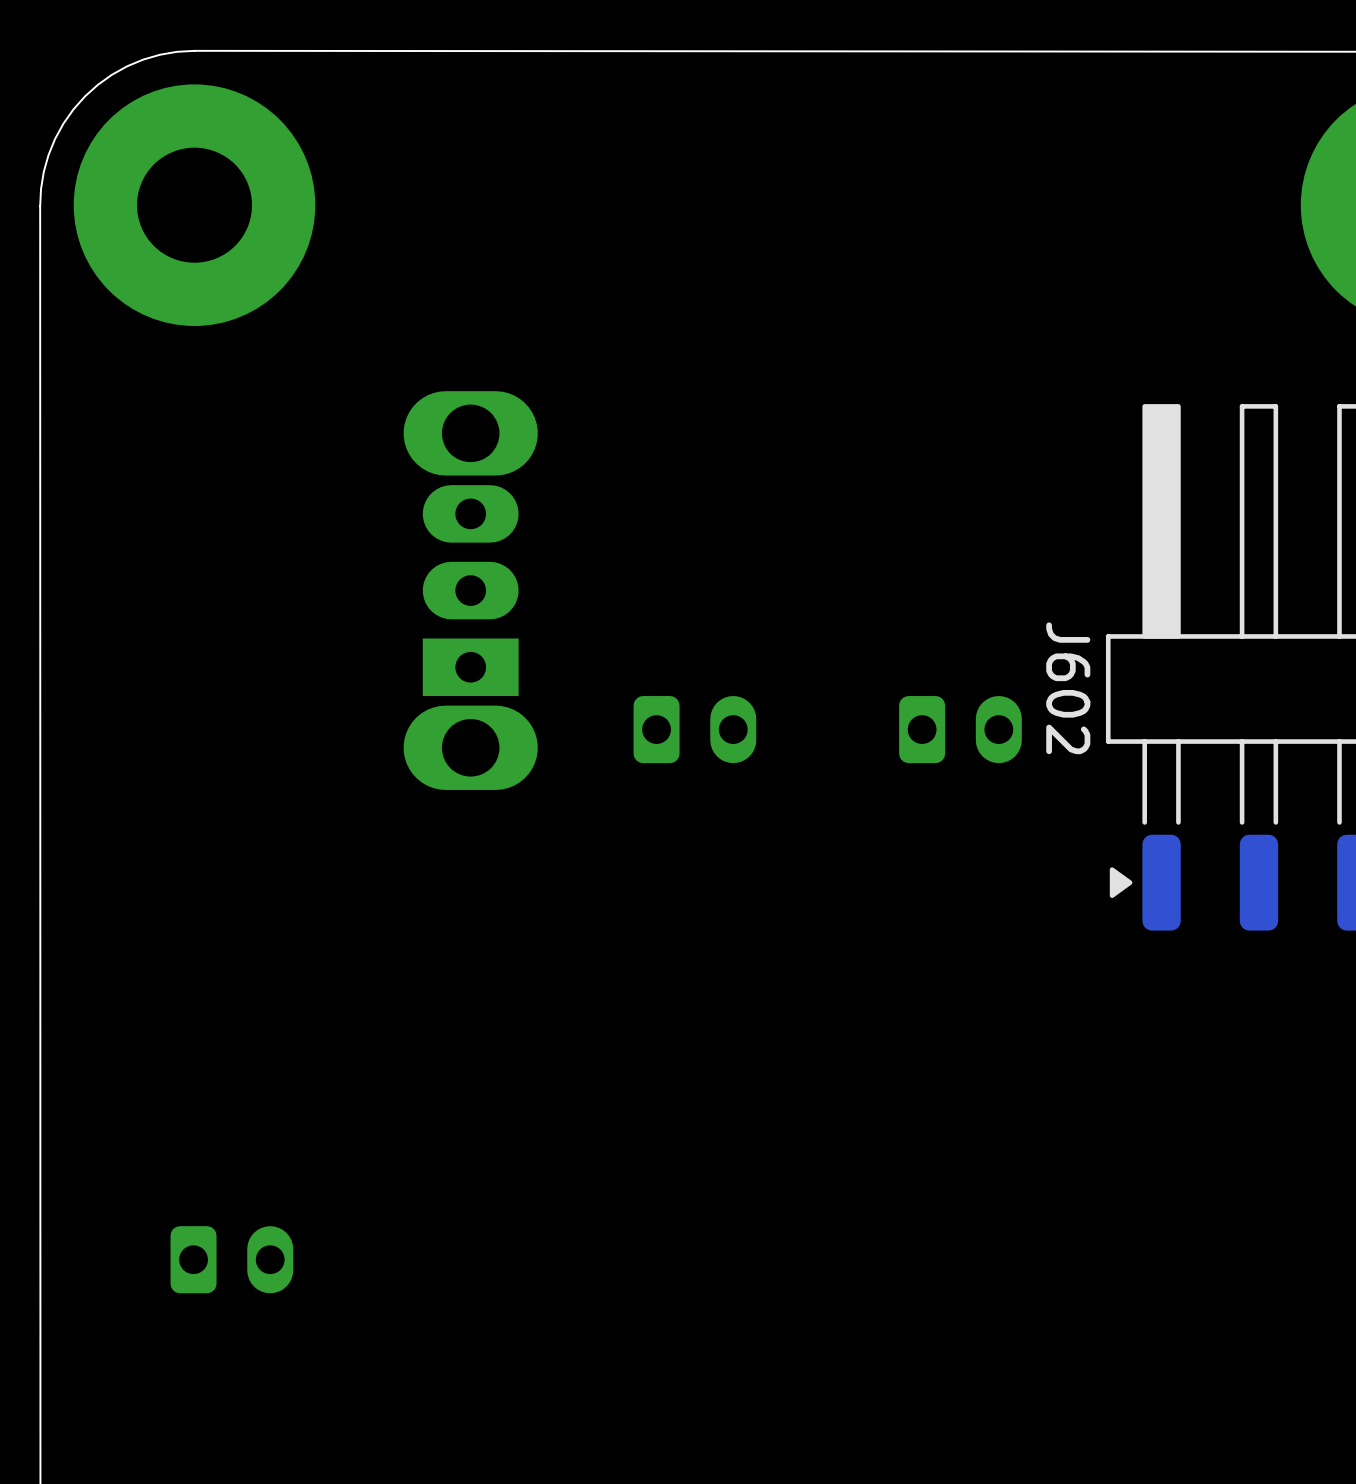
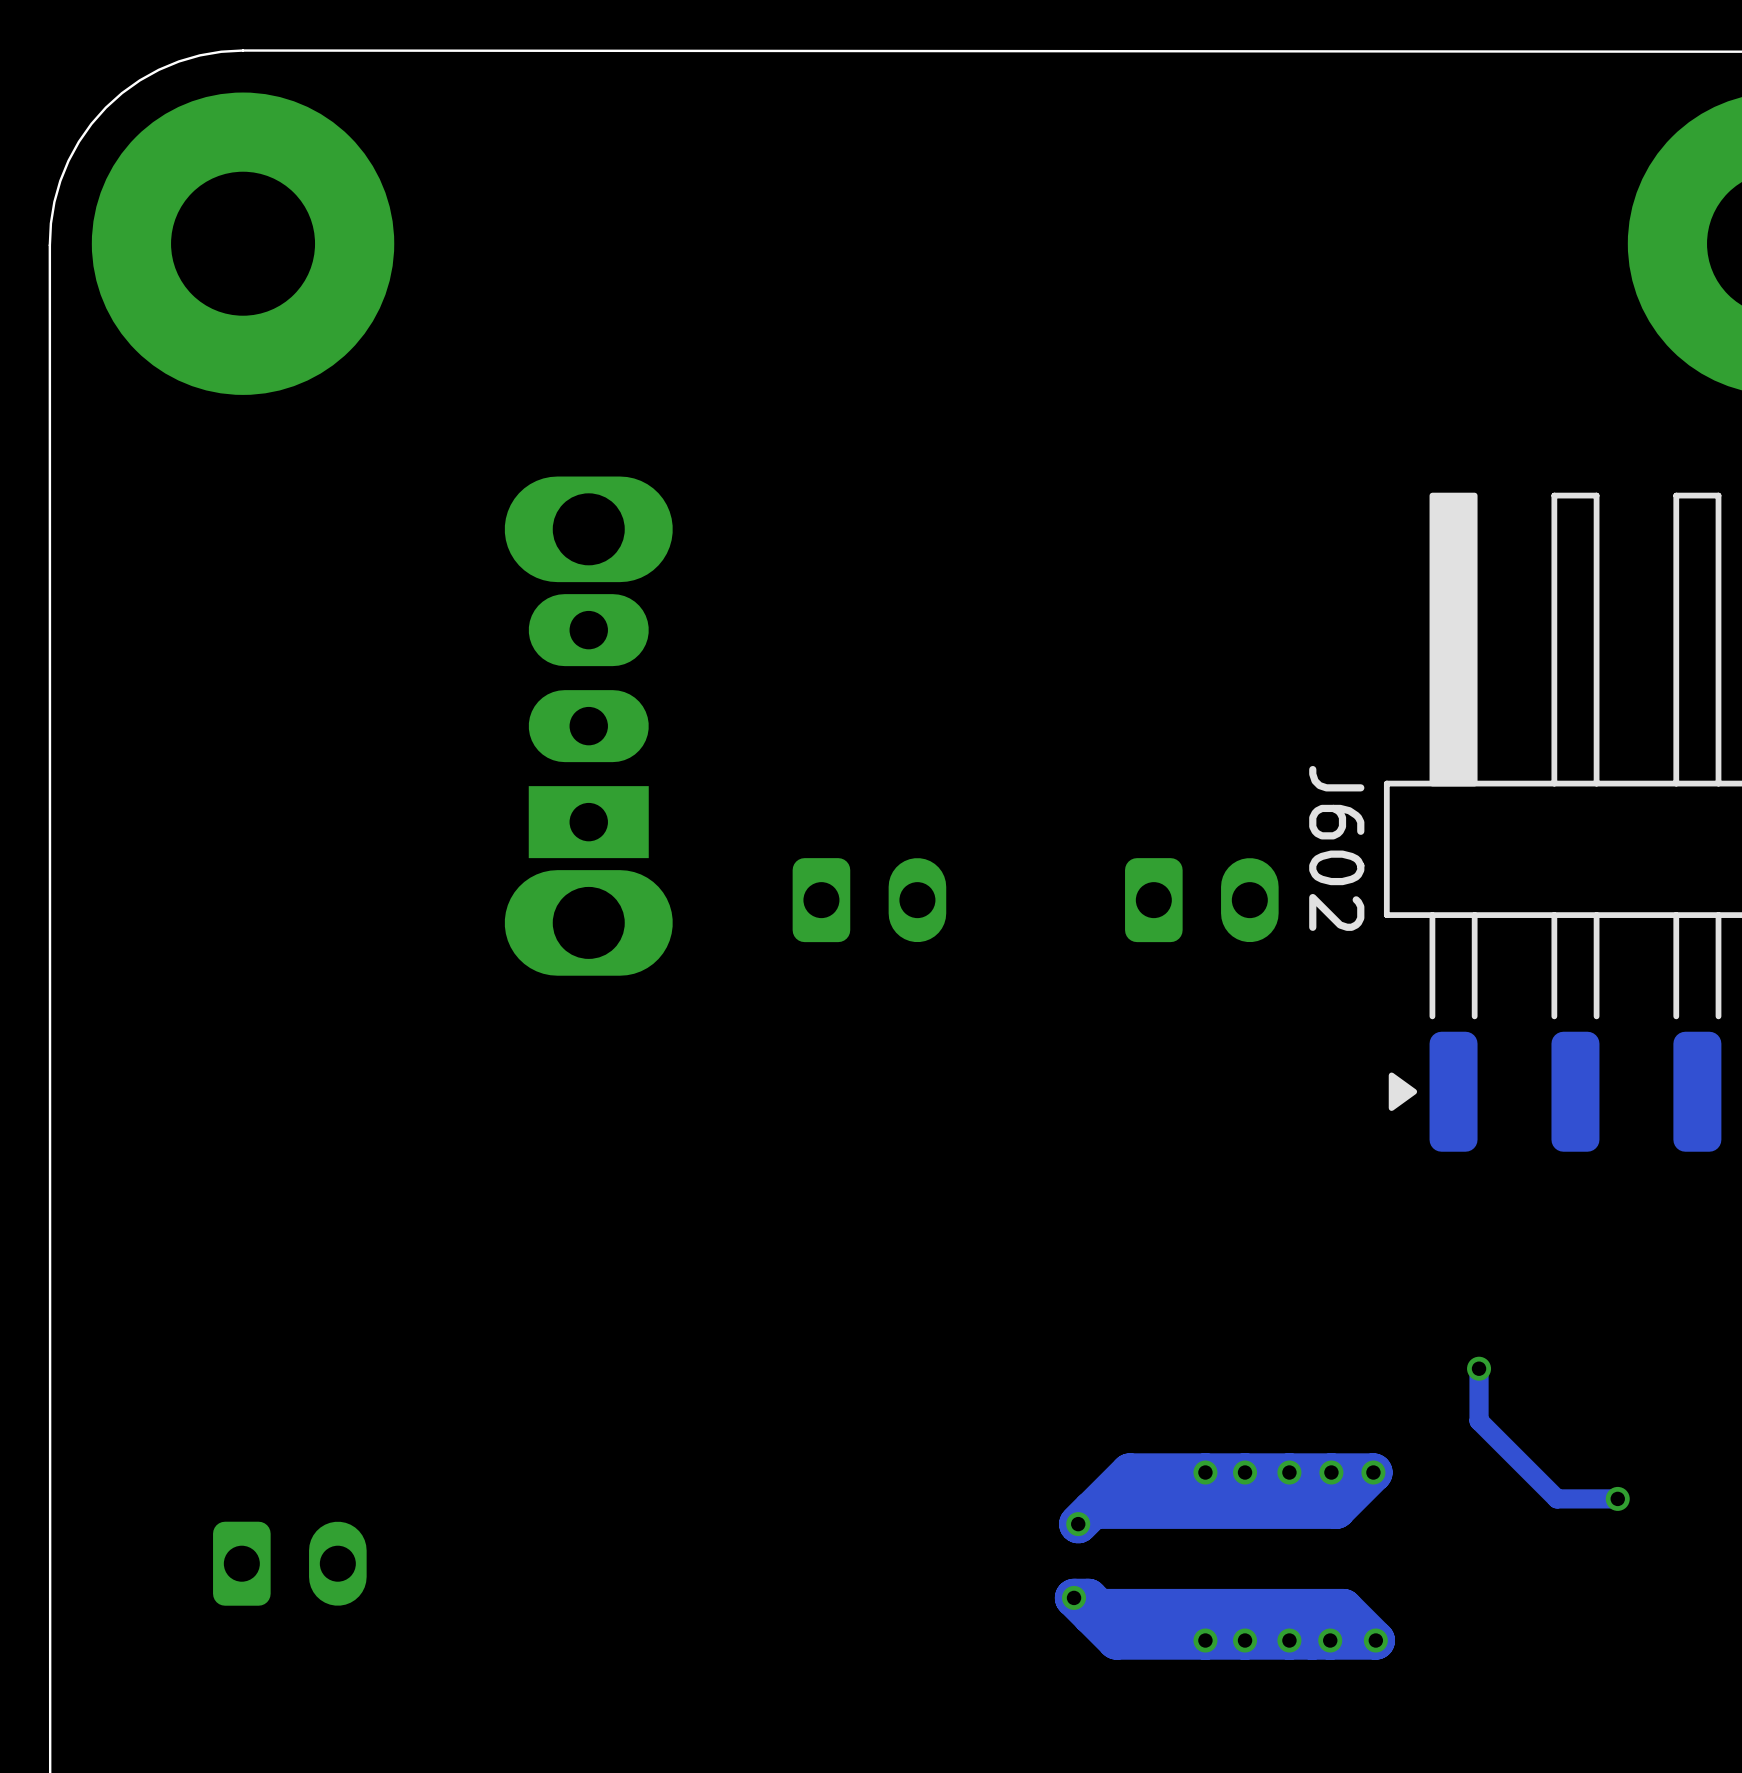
track: none -> (1479, 1368) (1479, 1420) (1557, 1498) (1617, 1498)
via: none -> (1479, 1368)
via: none -> (1205, 1472)
via: none -> (1245, 1472)
via: none -> (1289, 1472)
via: none -> (1331, 1472)
via: none -> (1373, 1472)
via: none -> (1617, 1498)
track: none -> (1092, 1509) (1336, 1509) (1373, 1472) (1129, 1472) (1078, 1524)
via: none -> (1078, 1524)
via: none -> (1074, 1597)
track: none -> (1088, 1597) (1098, 1608) (1343, 1608) (1375, 1640) (1116, 1640) (1074, 1597) (1088, 1597)
via: none -> (1205, 1640)
via: none -> (1245, 1640)
via: none -> (1289, 1640)
via: none -> (1330, 1640)
via: none -> (1375, 1640)

